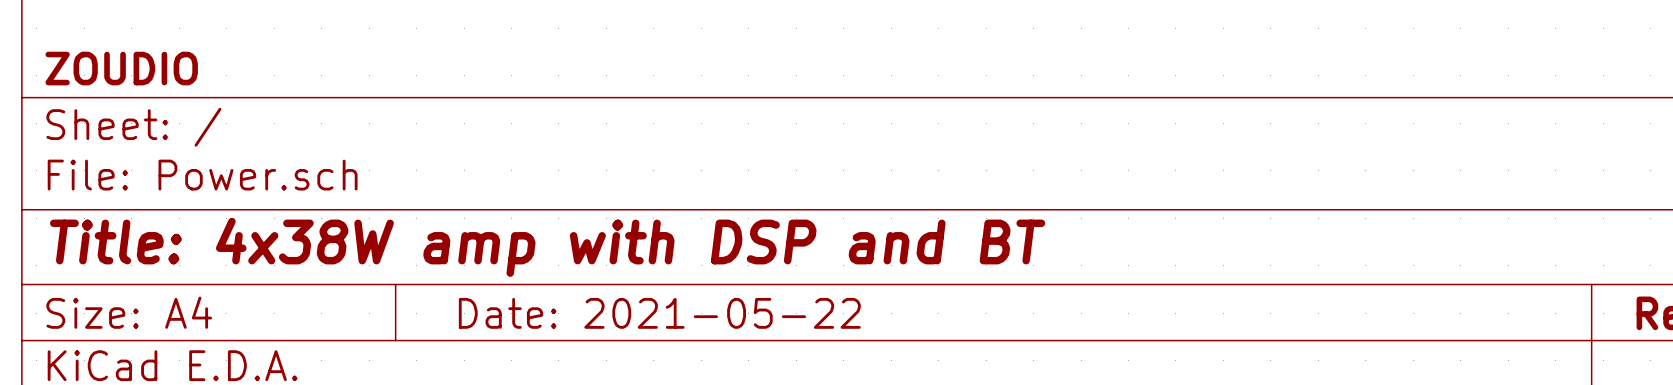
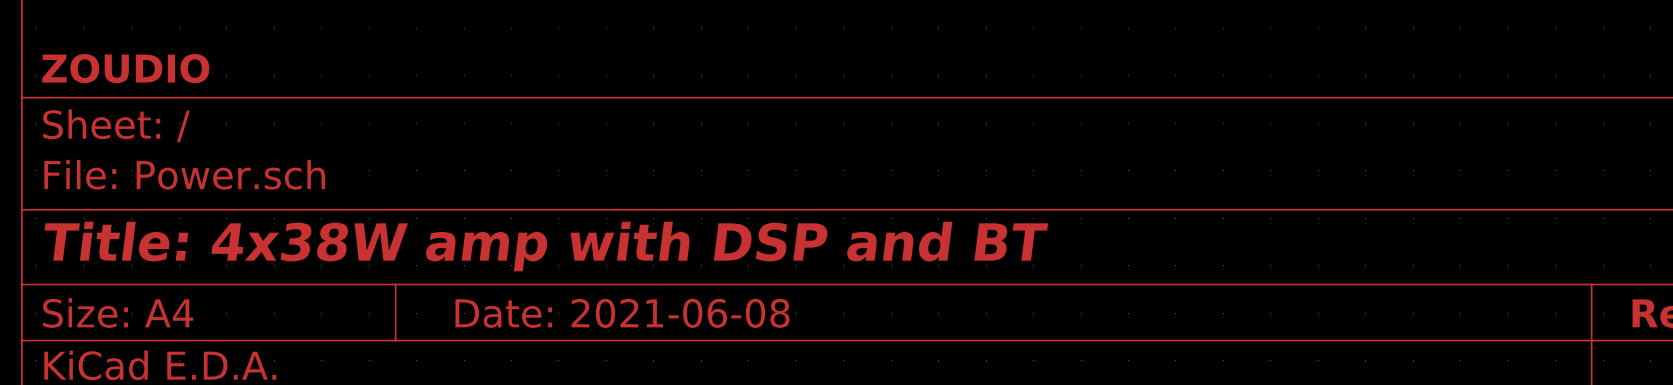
title block: Date: 2021-05-22 (659, 313) -> Date: 2021-06-08 (622, 313)

